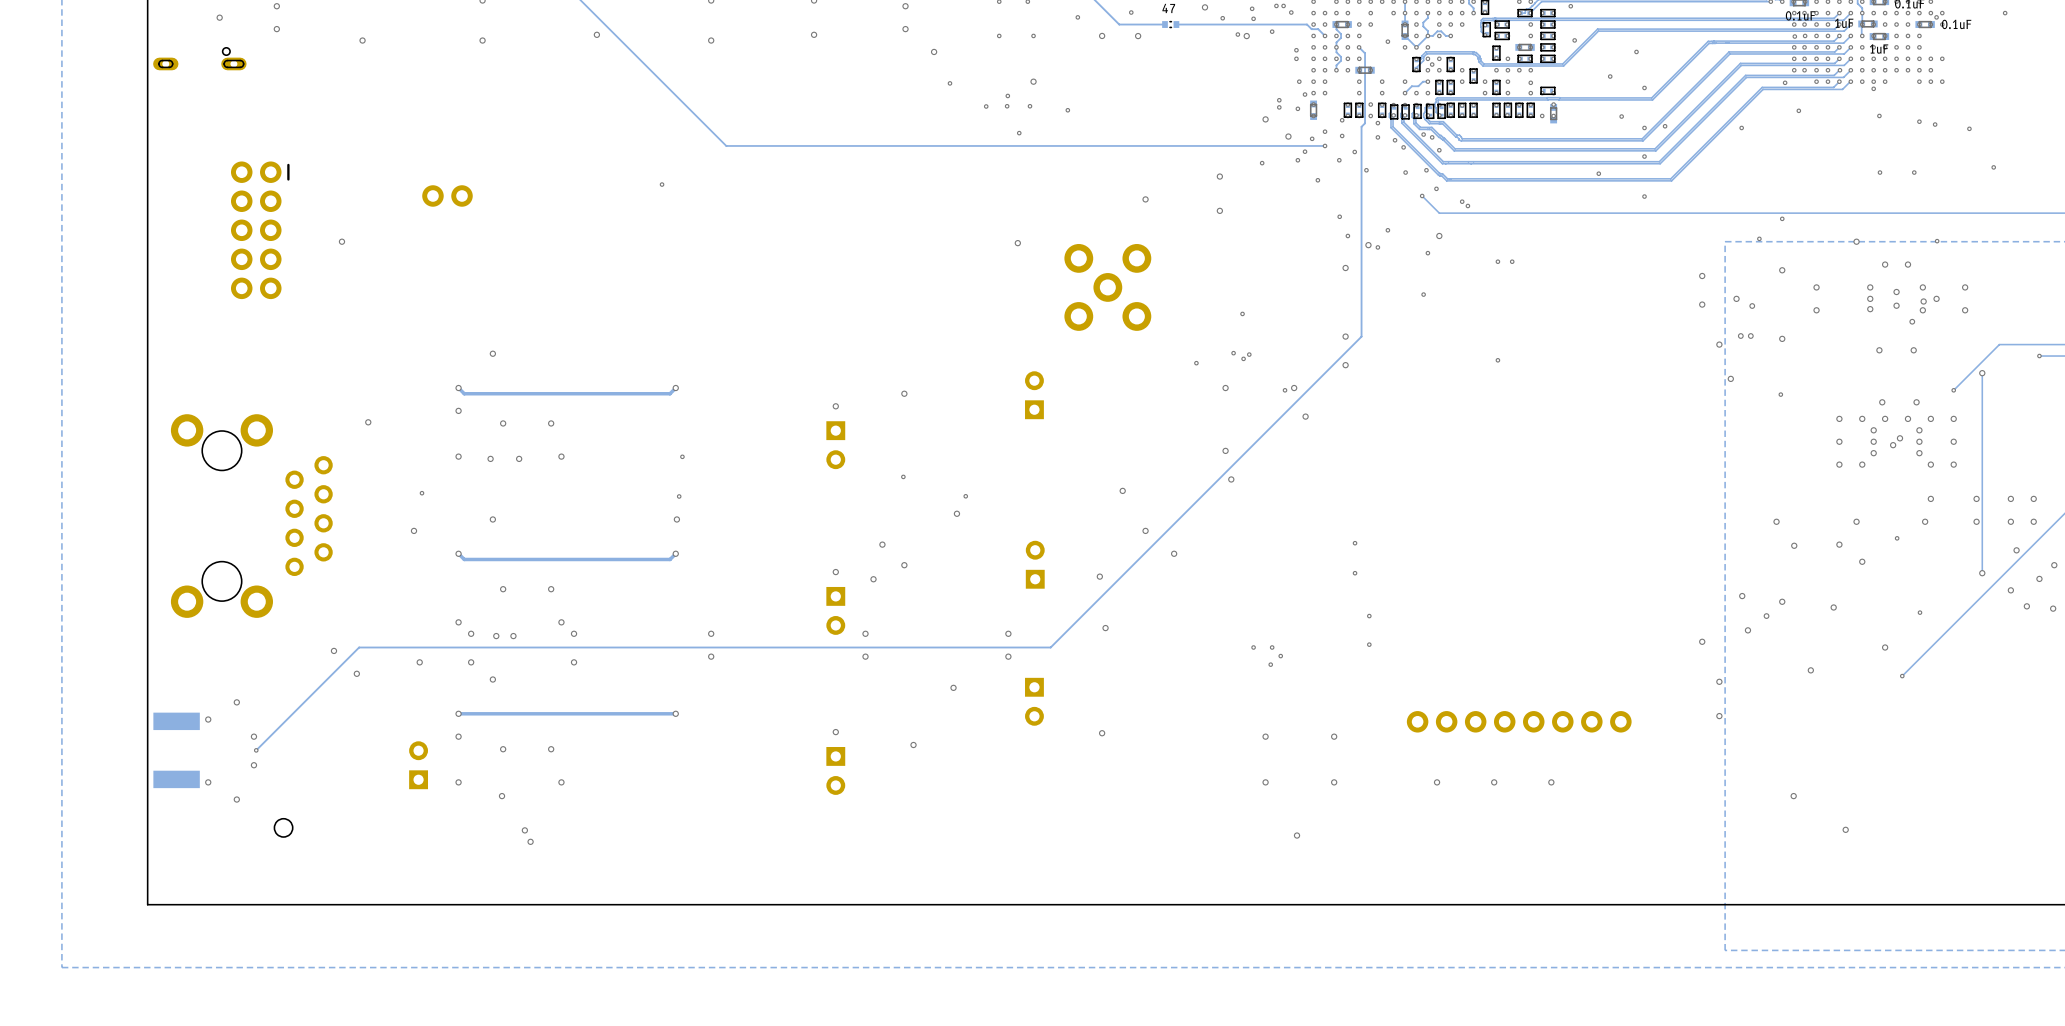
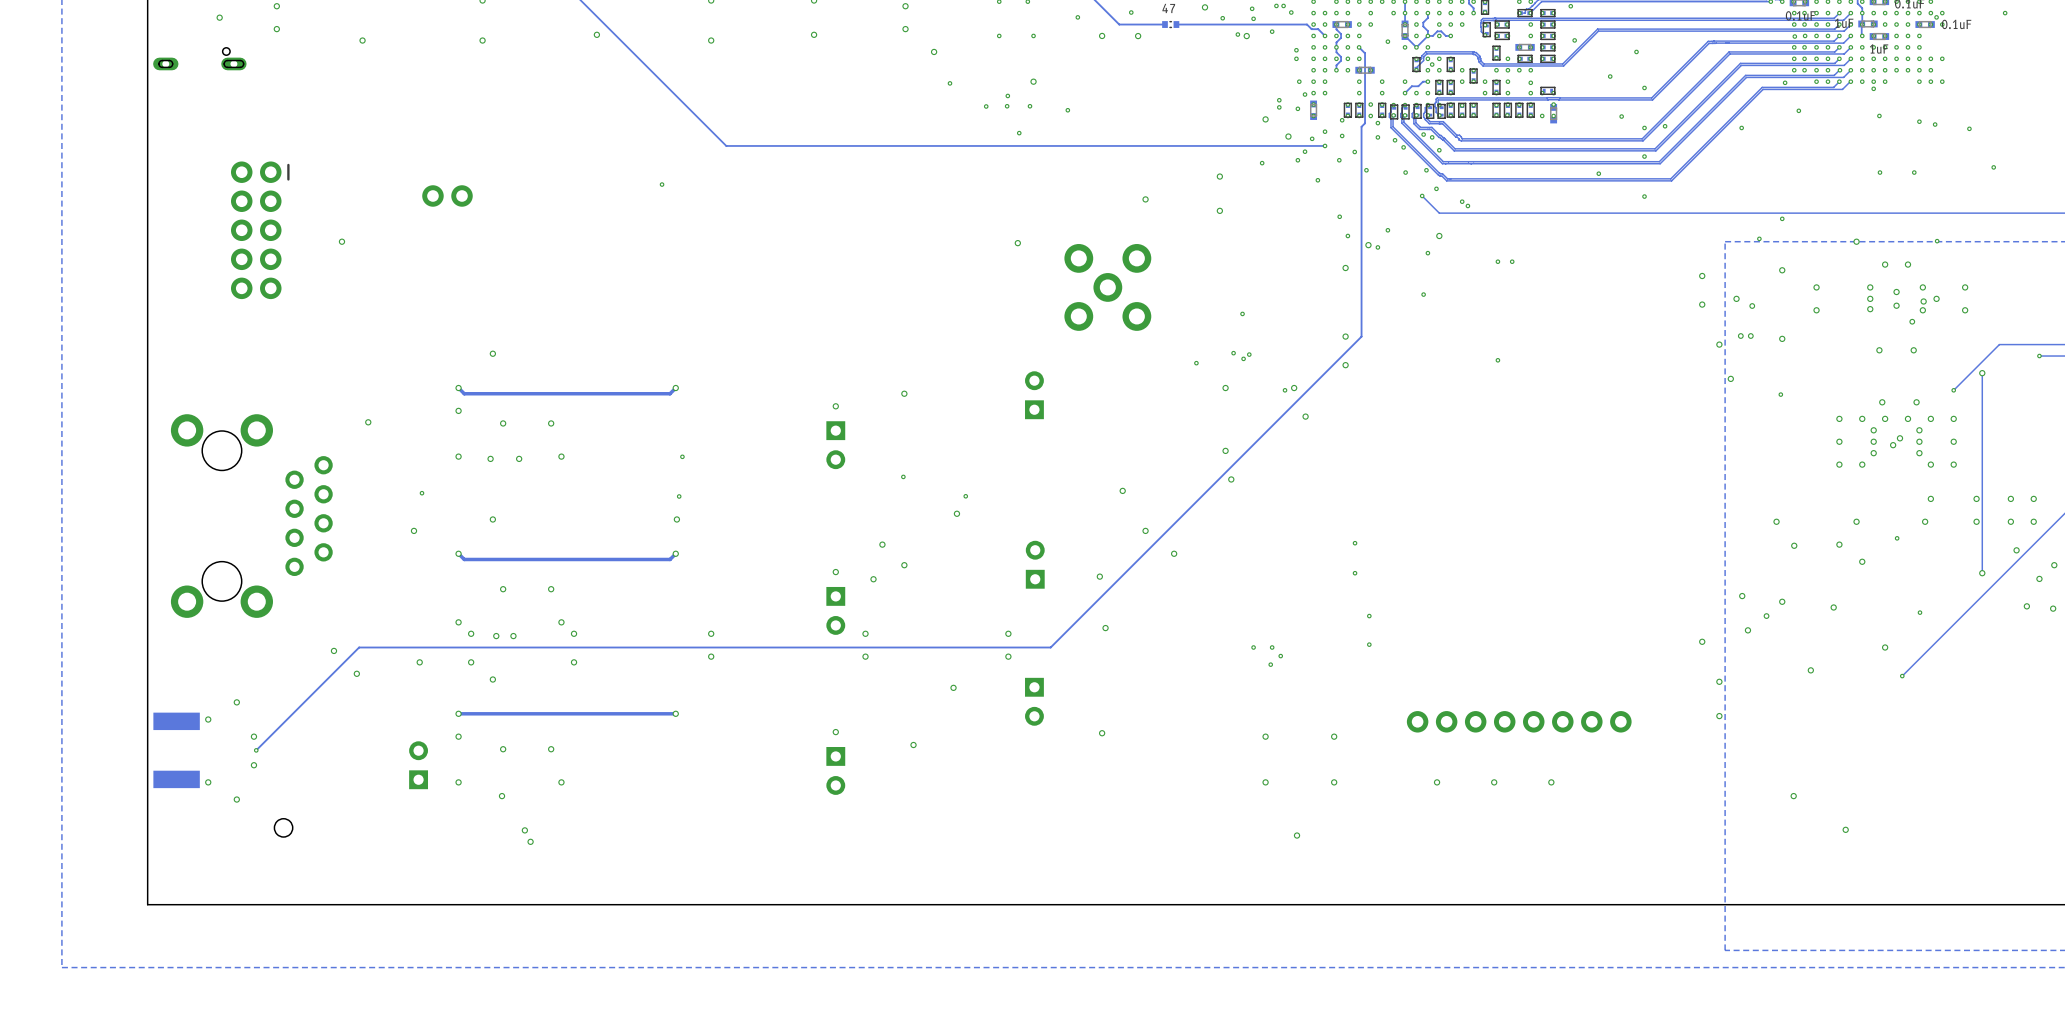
via: (2010, 590) -> none

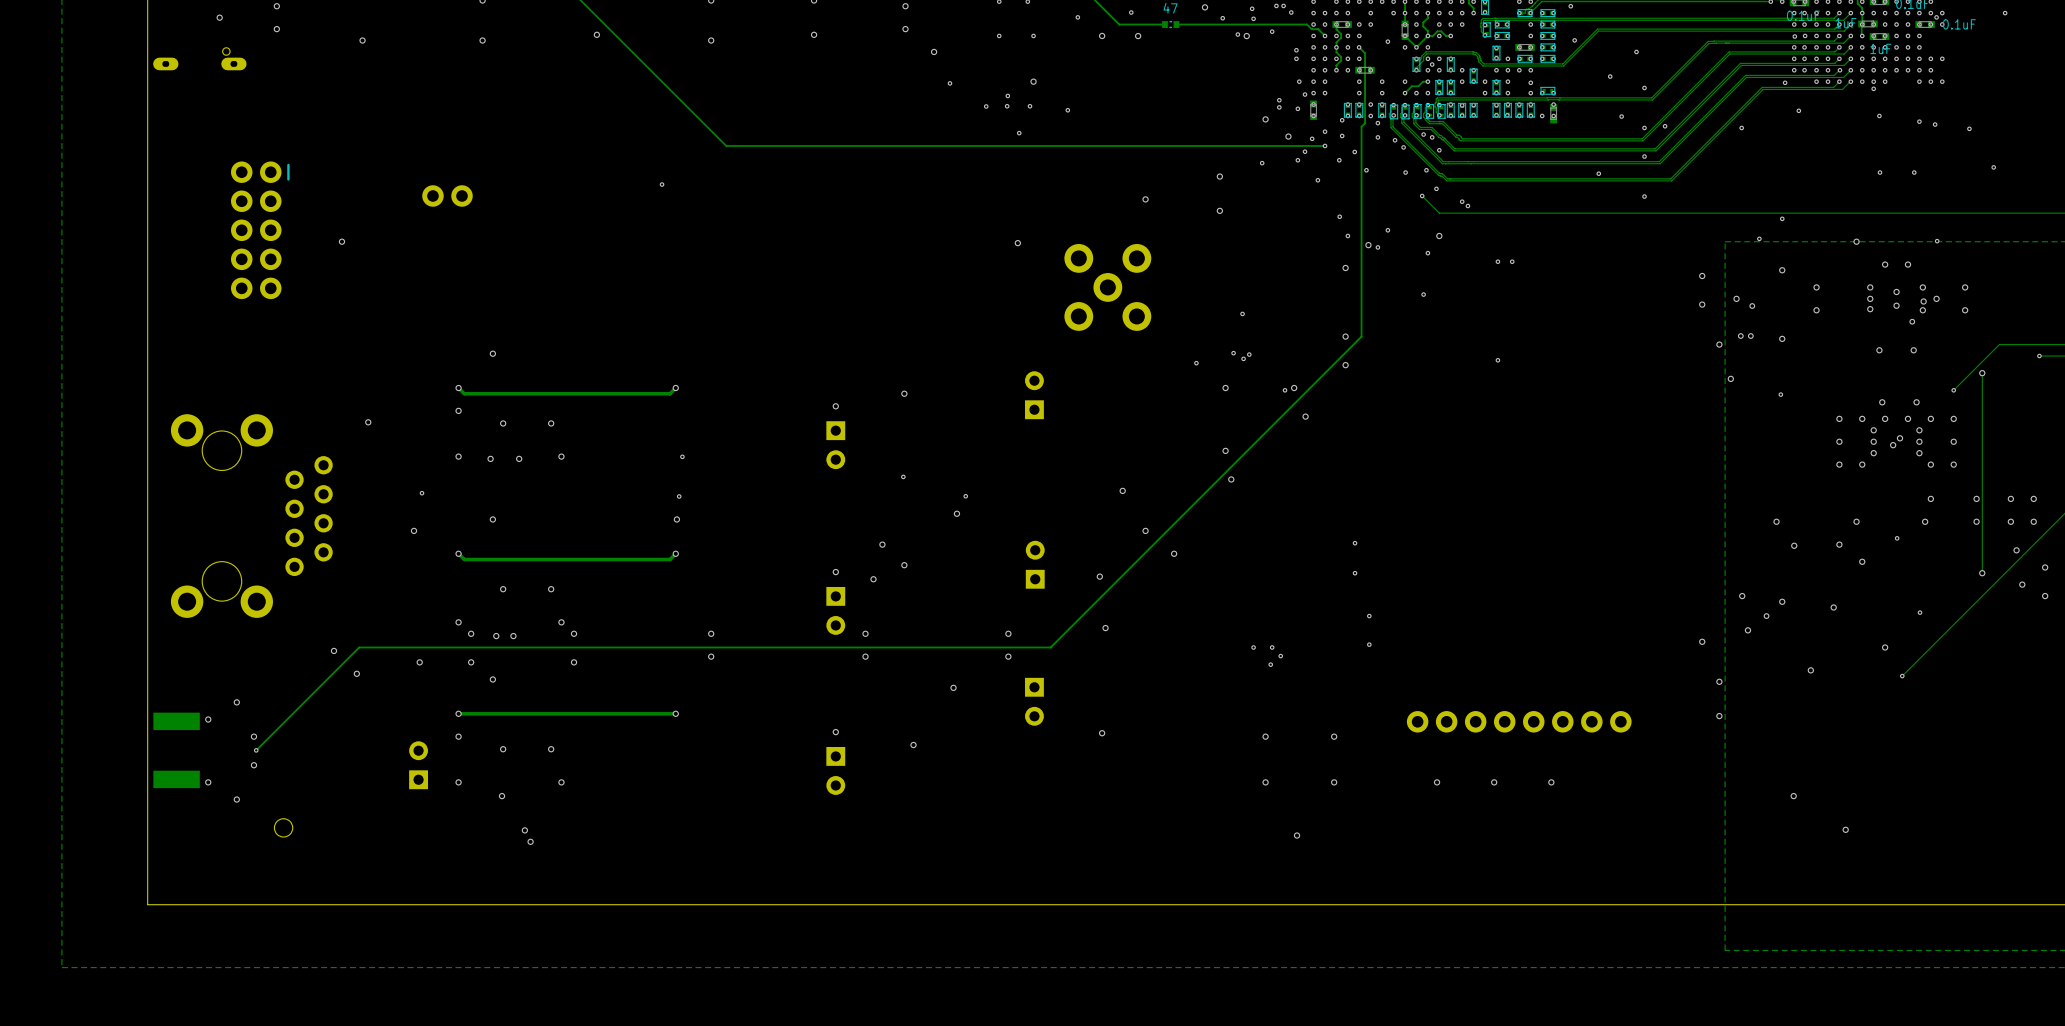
via: (2054, 565) -> none
via: none -> (2045, 567)
via: (2039, 578) -> none
via: none -> (2022, 584)
via: none -> (2045, 596)
via: (2026, 606) -> none
via: (2053, 608) -> none

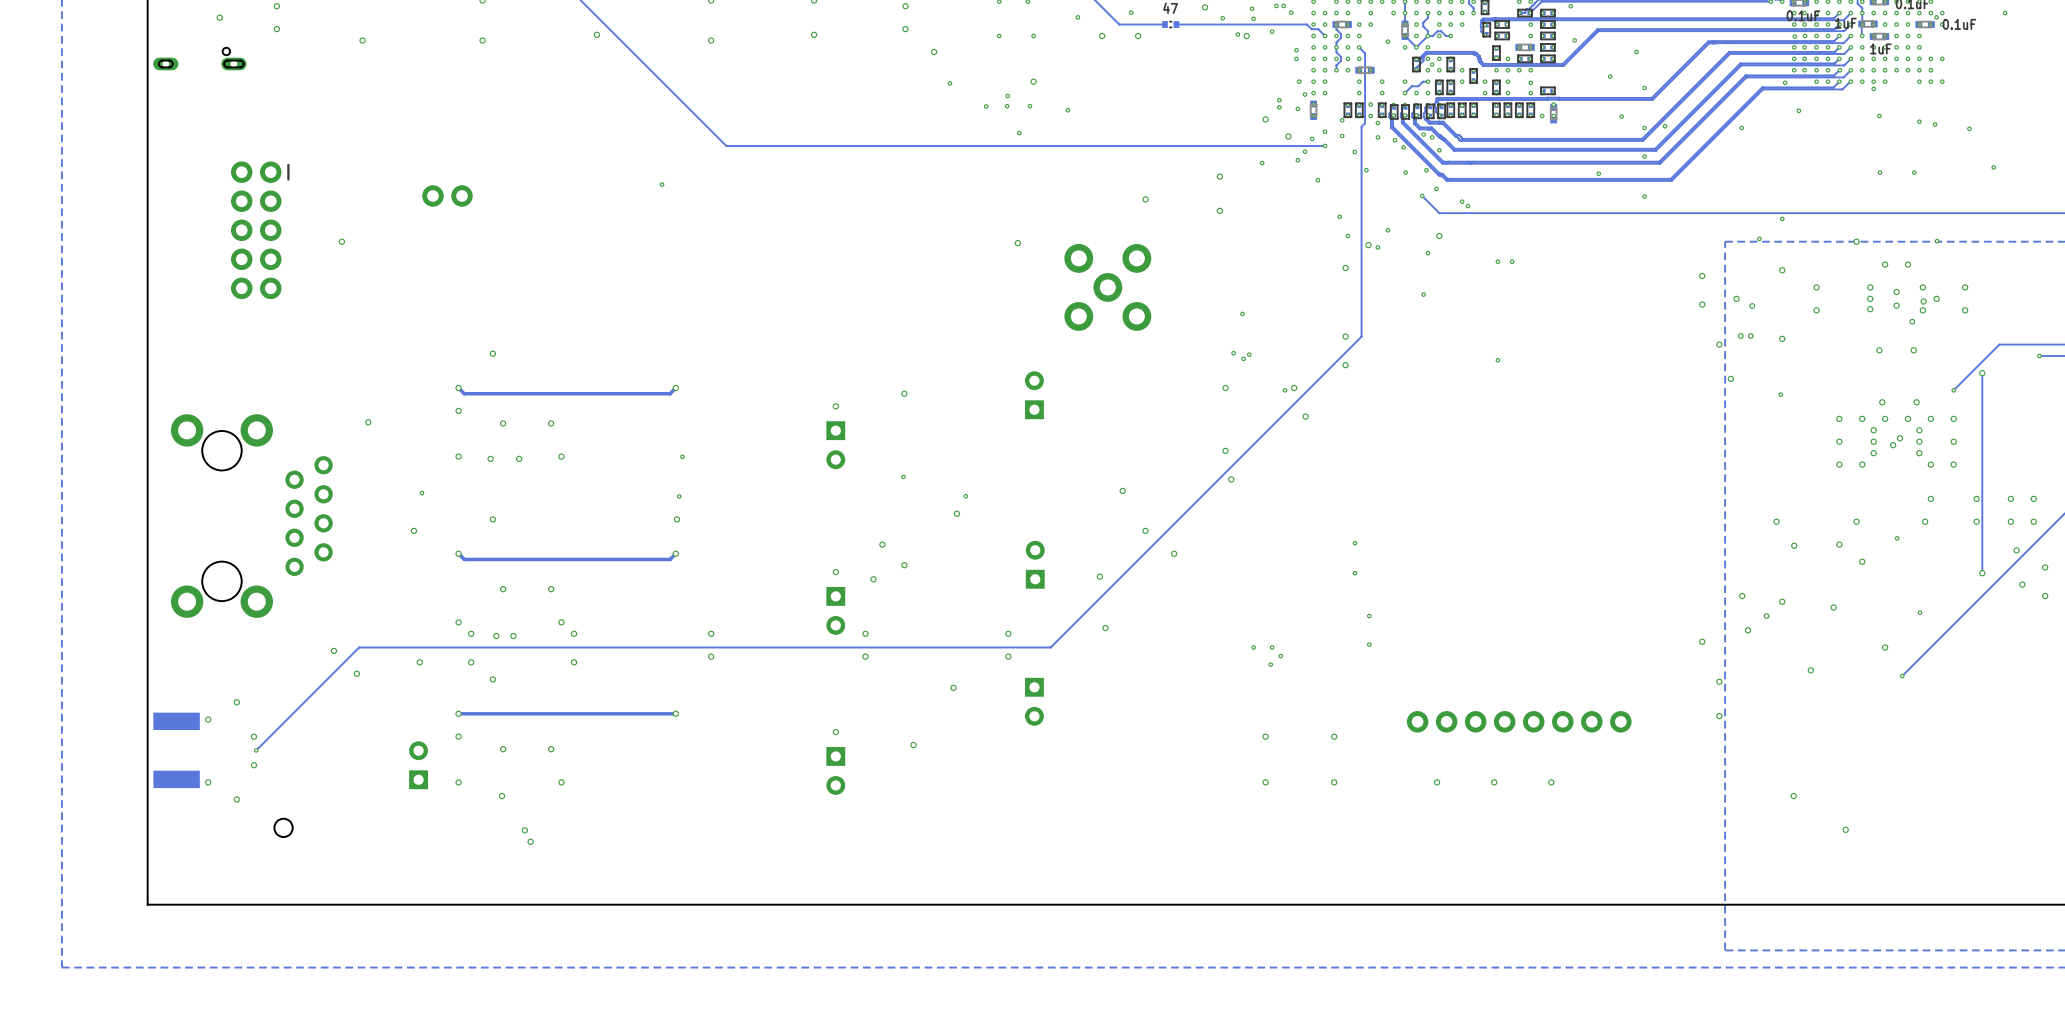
via: (1339, 160) -> none
via: (1196, 363) -> none
via: (1102, 733) -> none
via: (1297, 835) -> none

